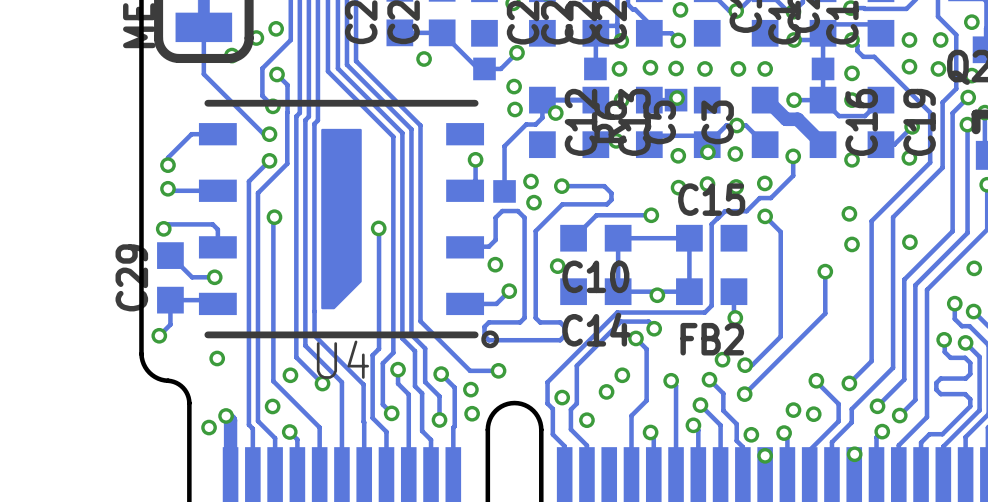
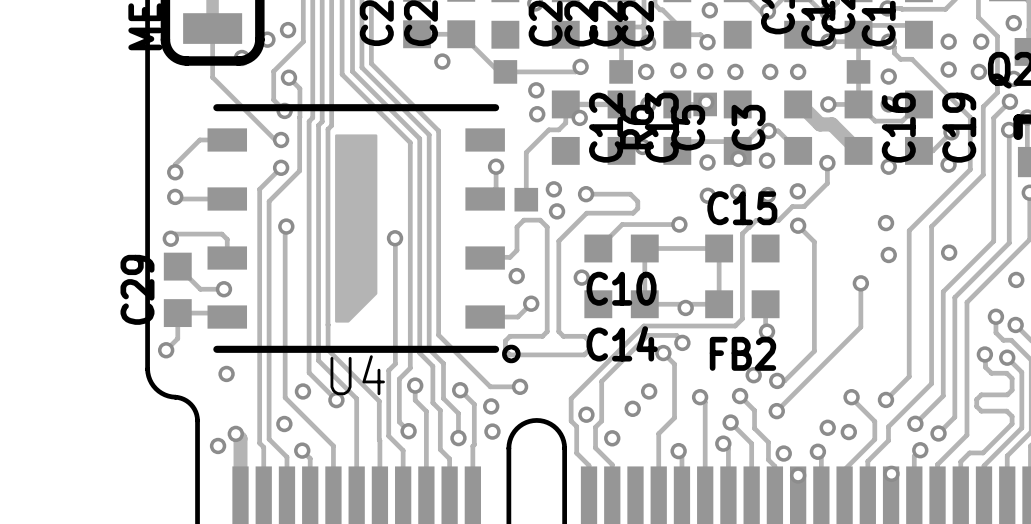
track: (517, 52) (500, 68) -> (580, 66) (575, 71) (522, 71)
via position: (517, 52) -> (580, 66)

